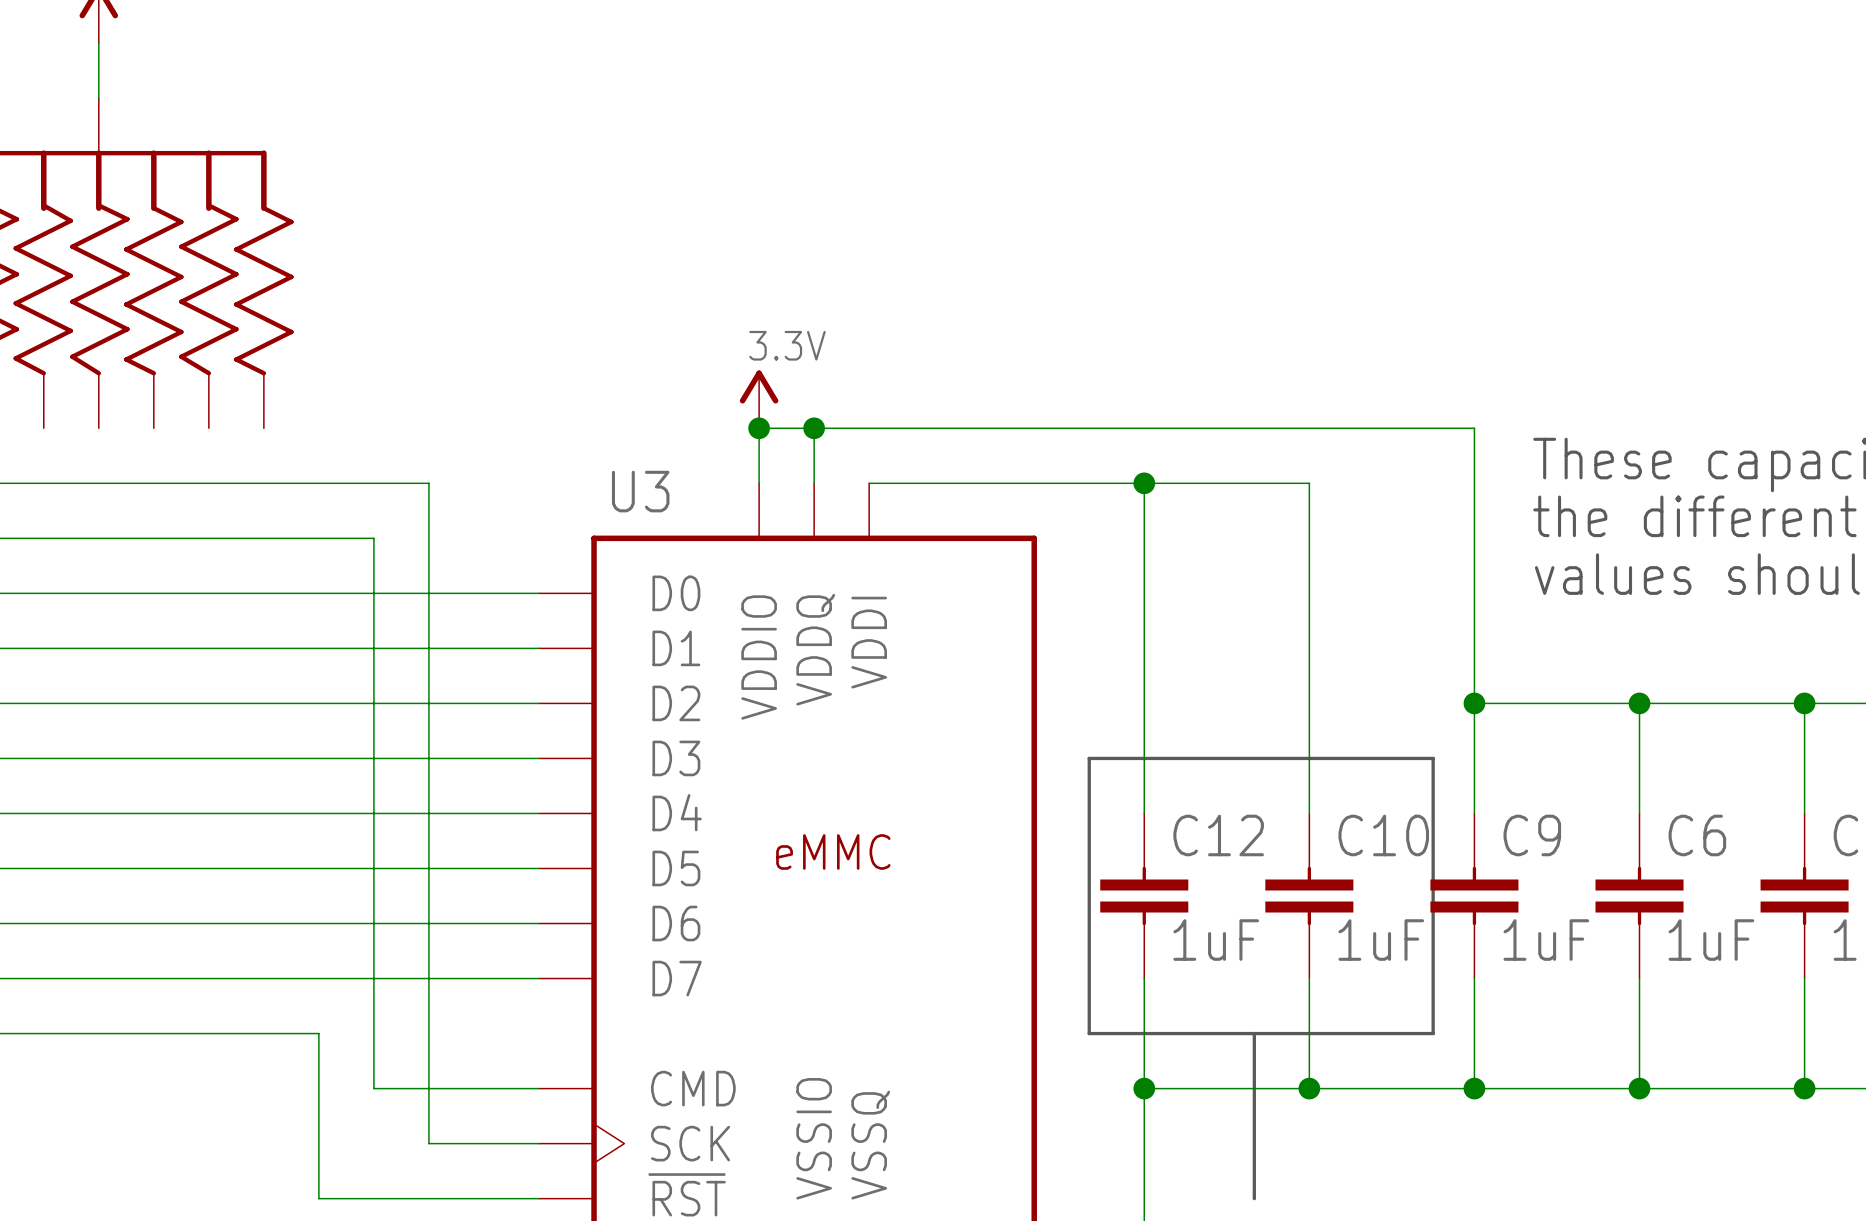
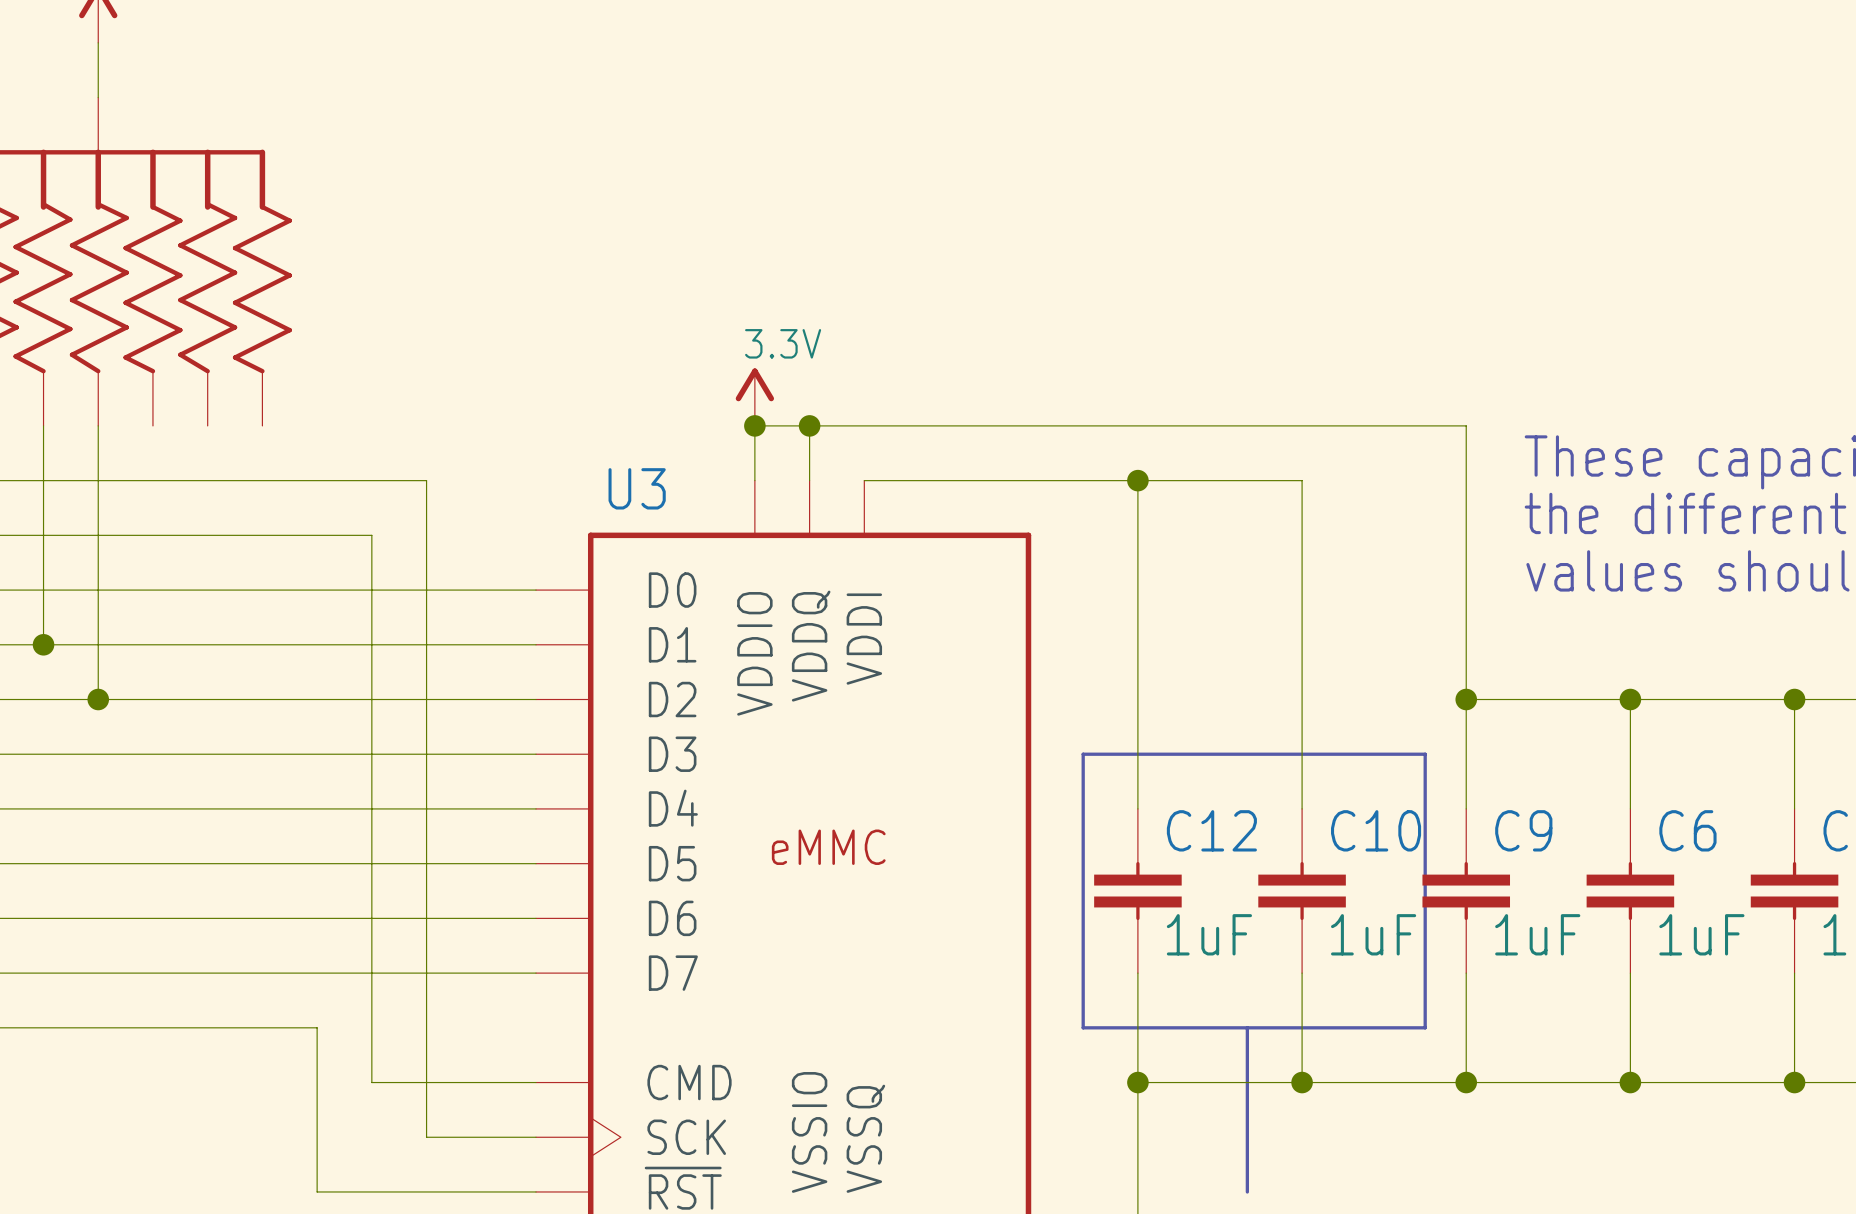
wire: none -> (43, 425) (43, 644)
wire: none -> (98, 425) (98, 699)
junction: none -> (43, 644)
junction: none -> (98, 699)

